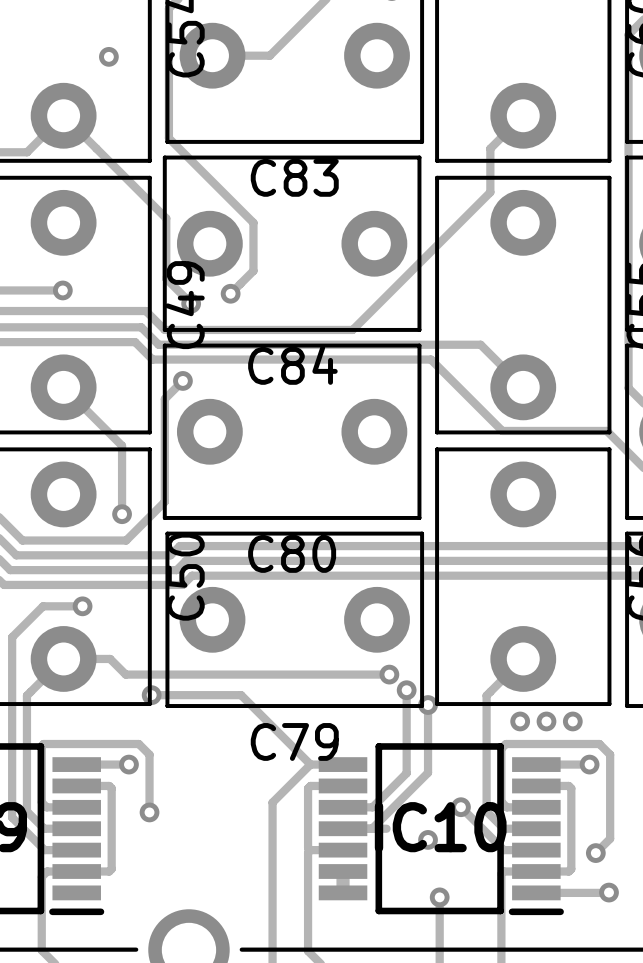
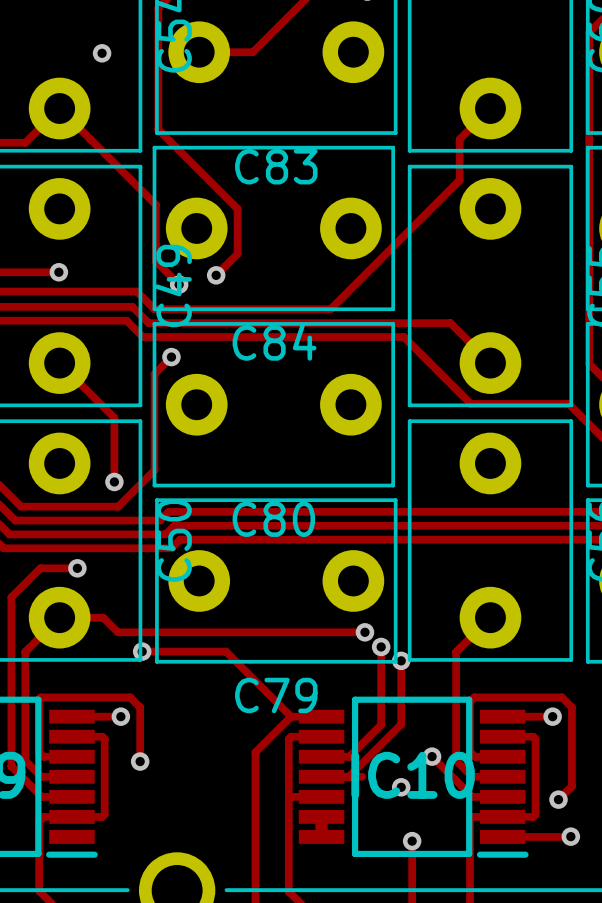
via: (520, 721) -> none
via: (546, 721) -> none
via: (572, 721) -> none

